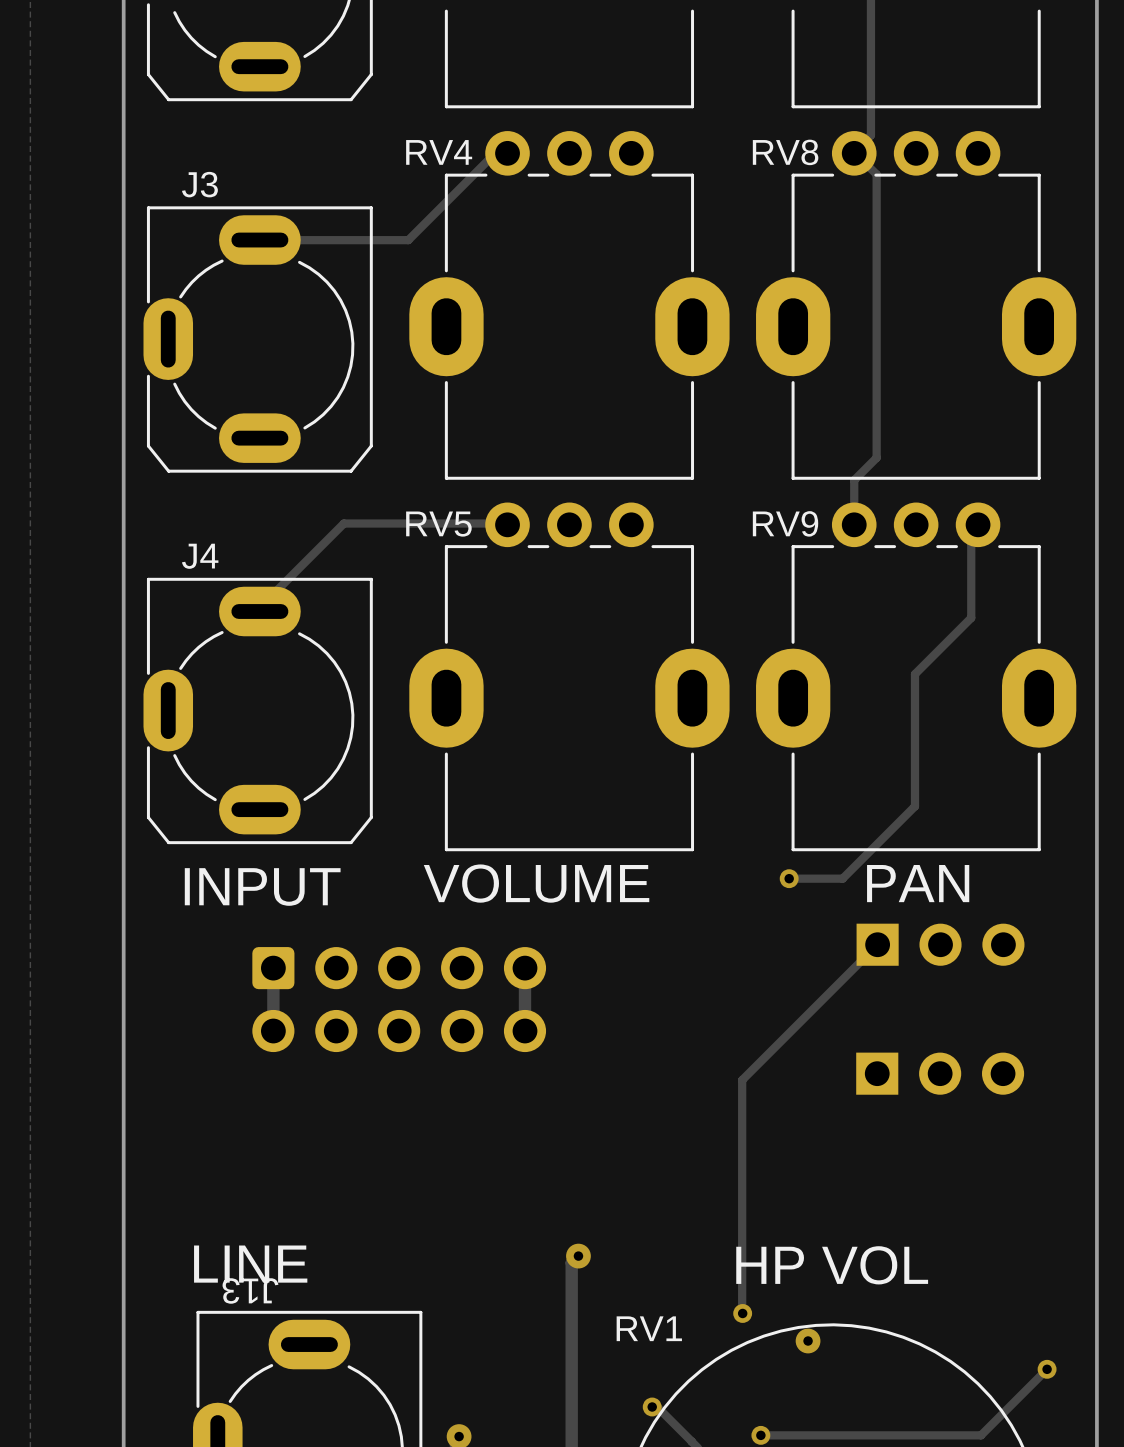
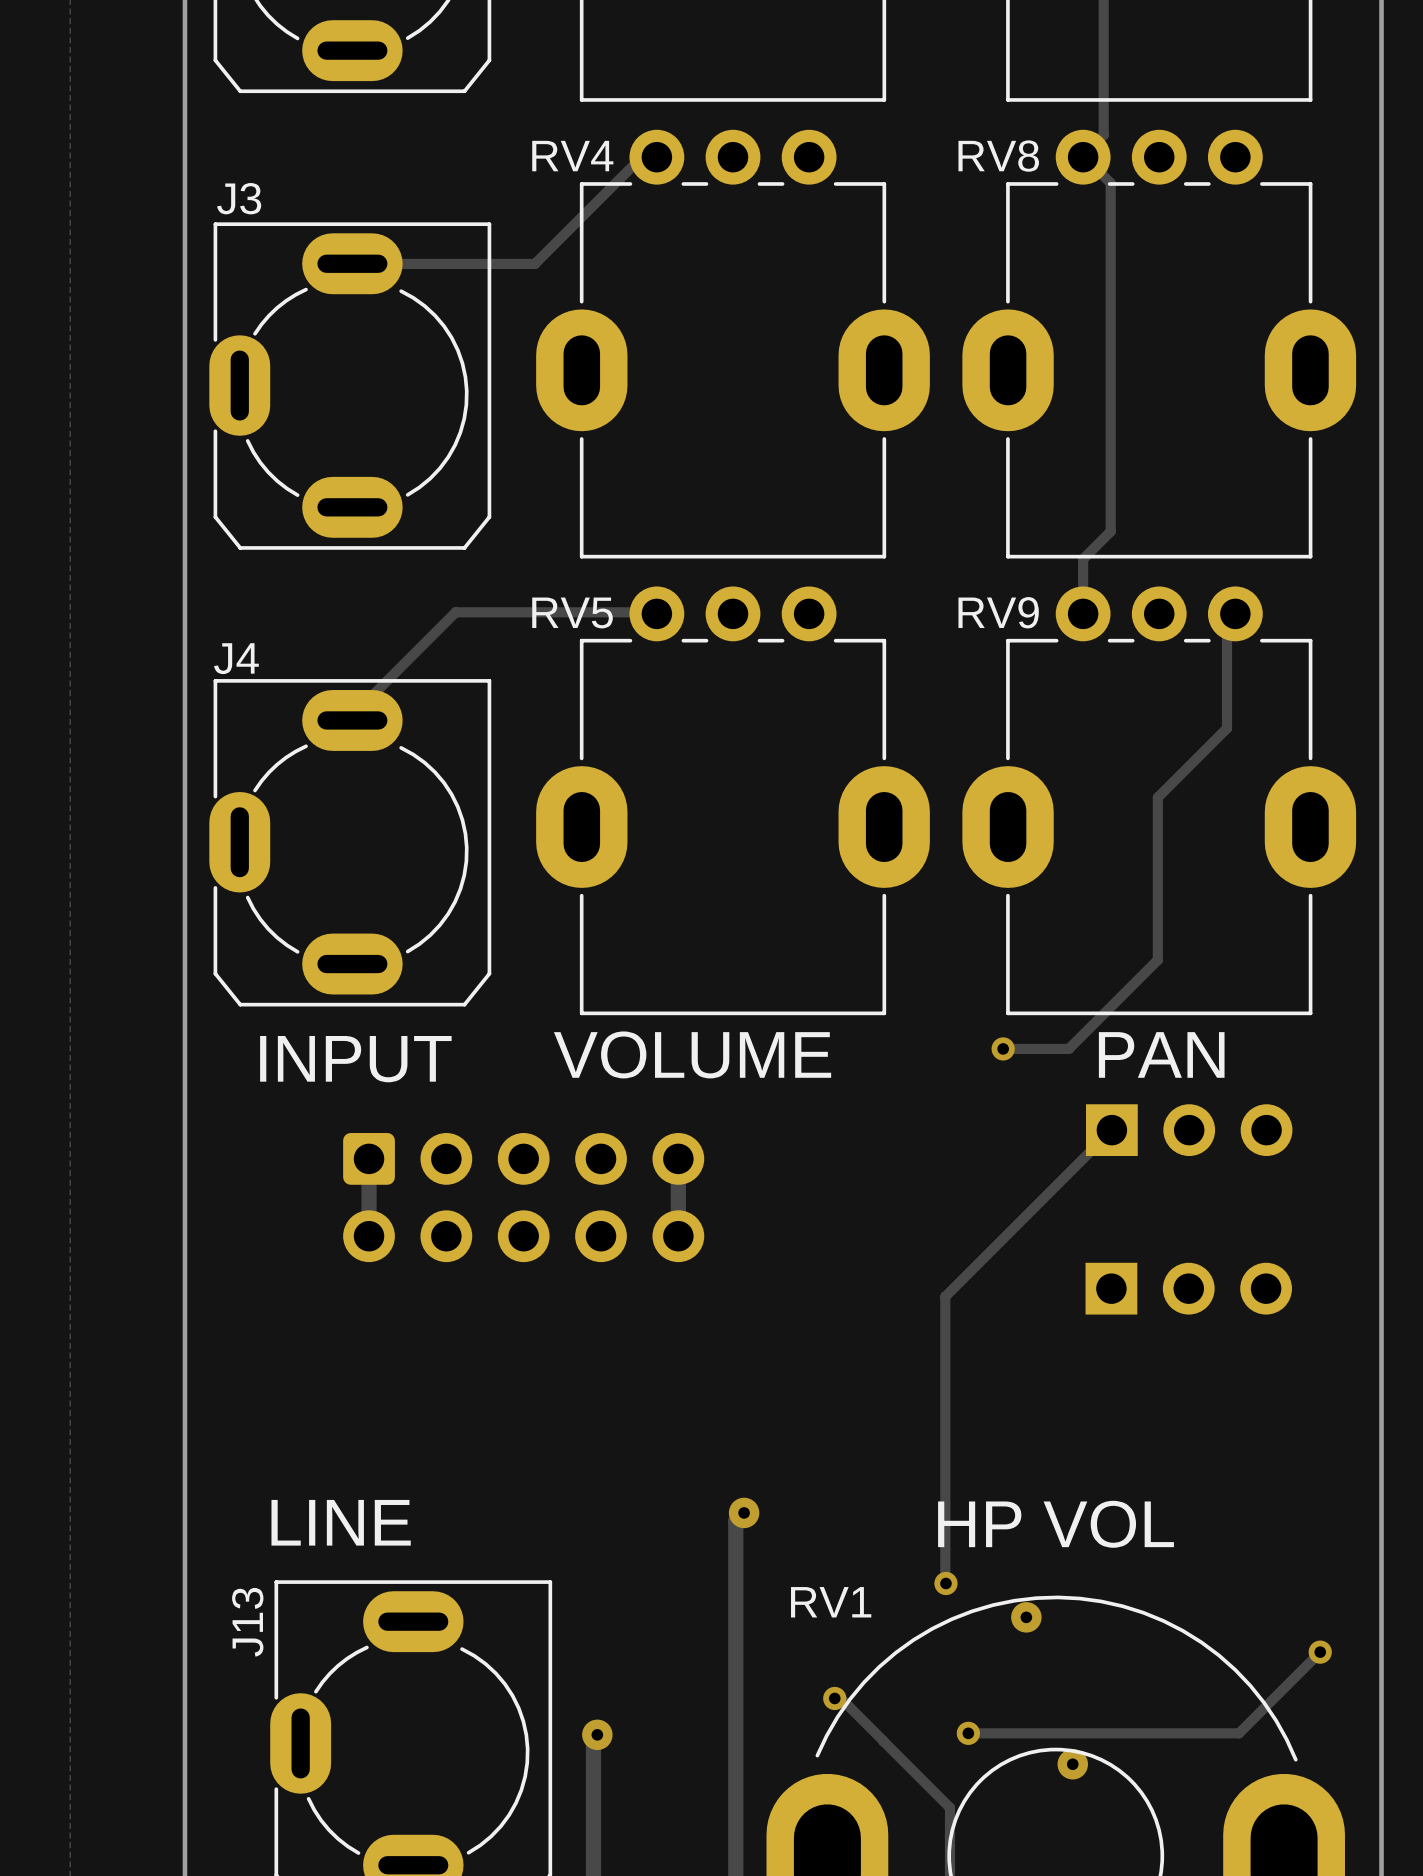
J3 name position: J3 (199, 184) -> J3 (239, 198)
J4 name position: J4 (200, 556) -> J4 (236, 658)
J13 name rotation: 0° (250, 1290) -> 90° clockwise (247, 1622)
J13 name position: J13 (250, 1290) -> J13 (247, 1622)

